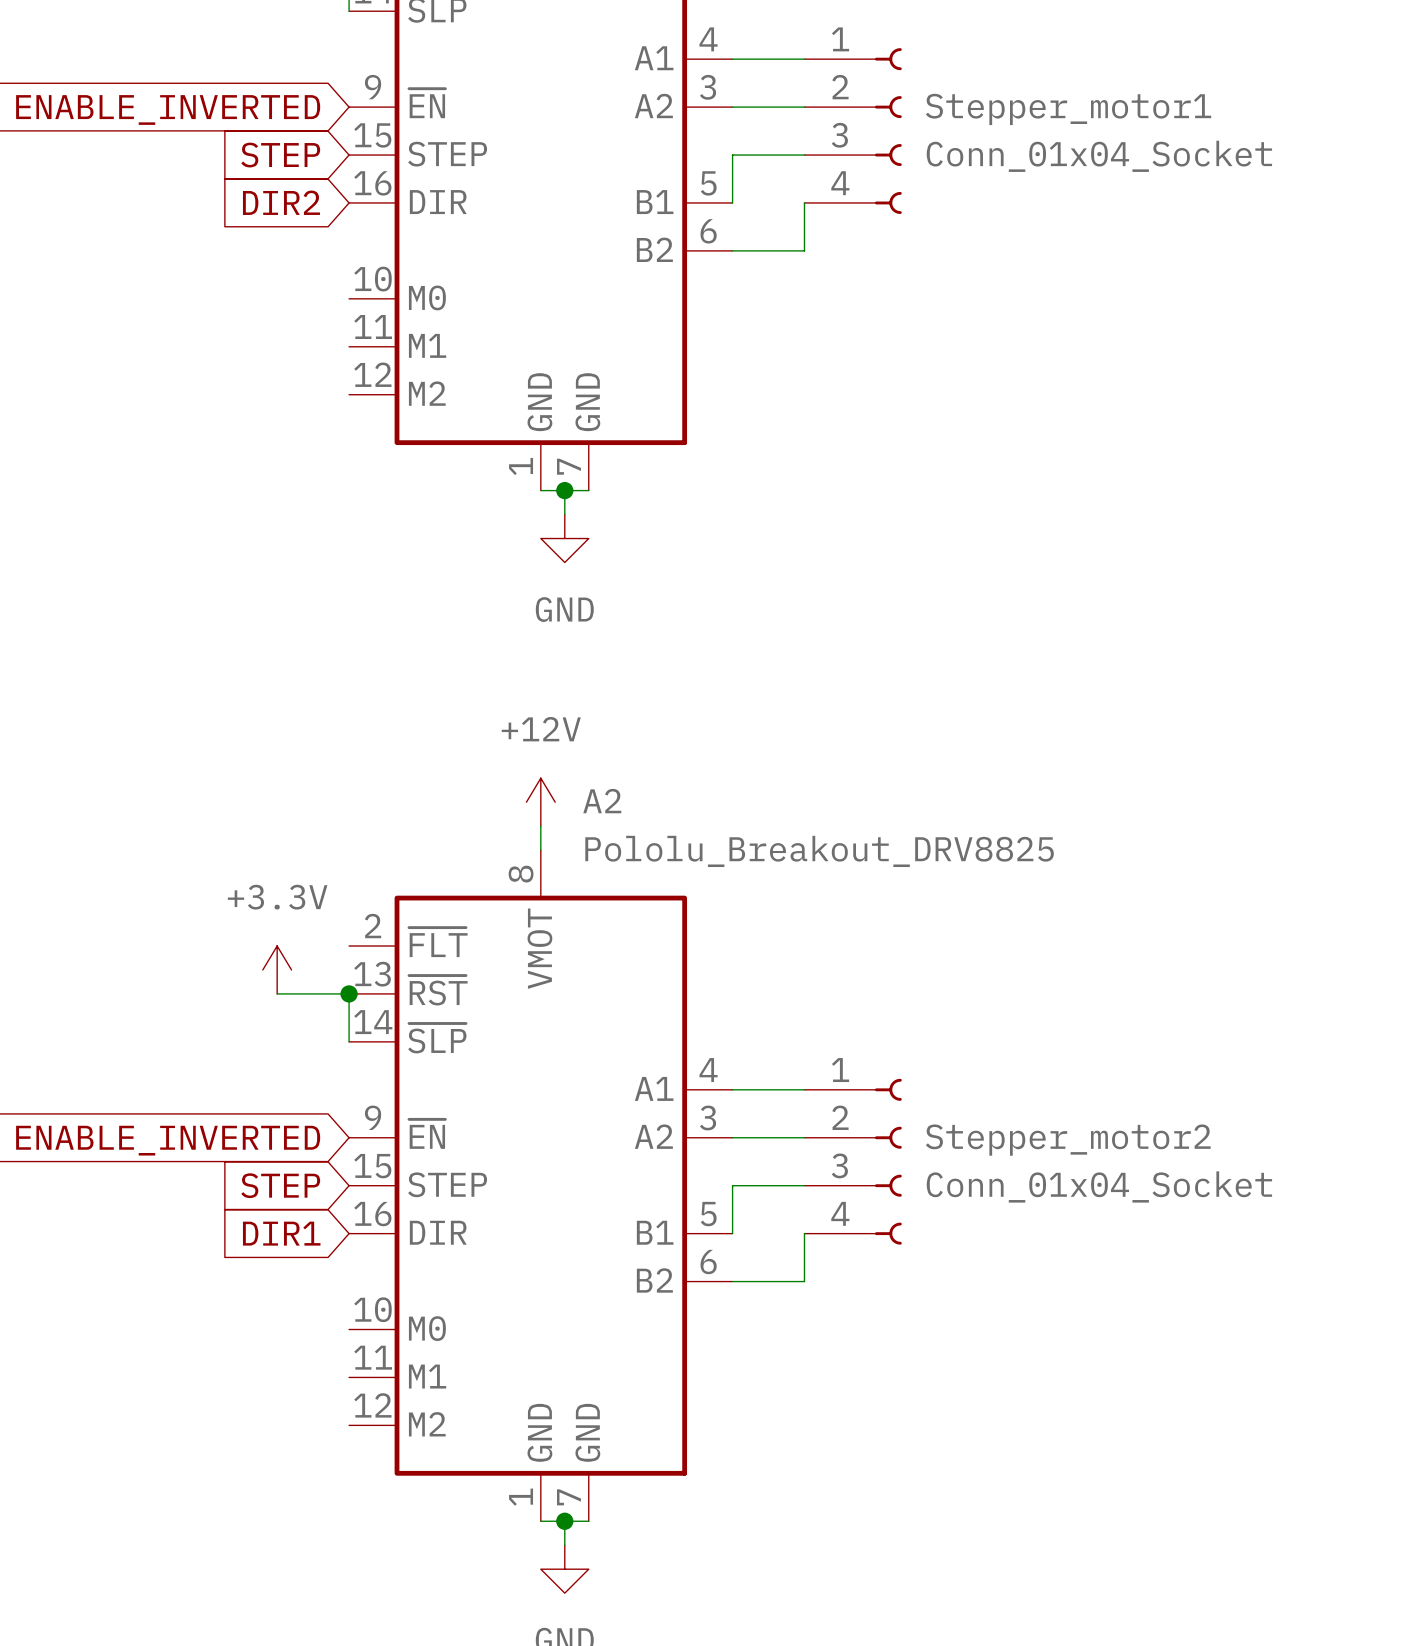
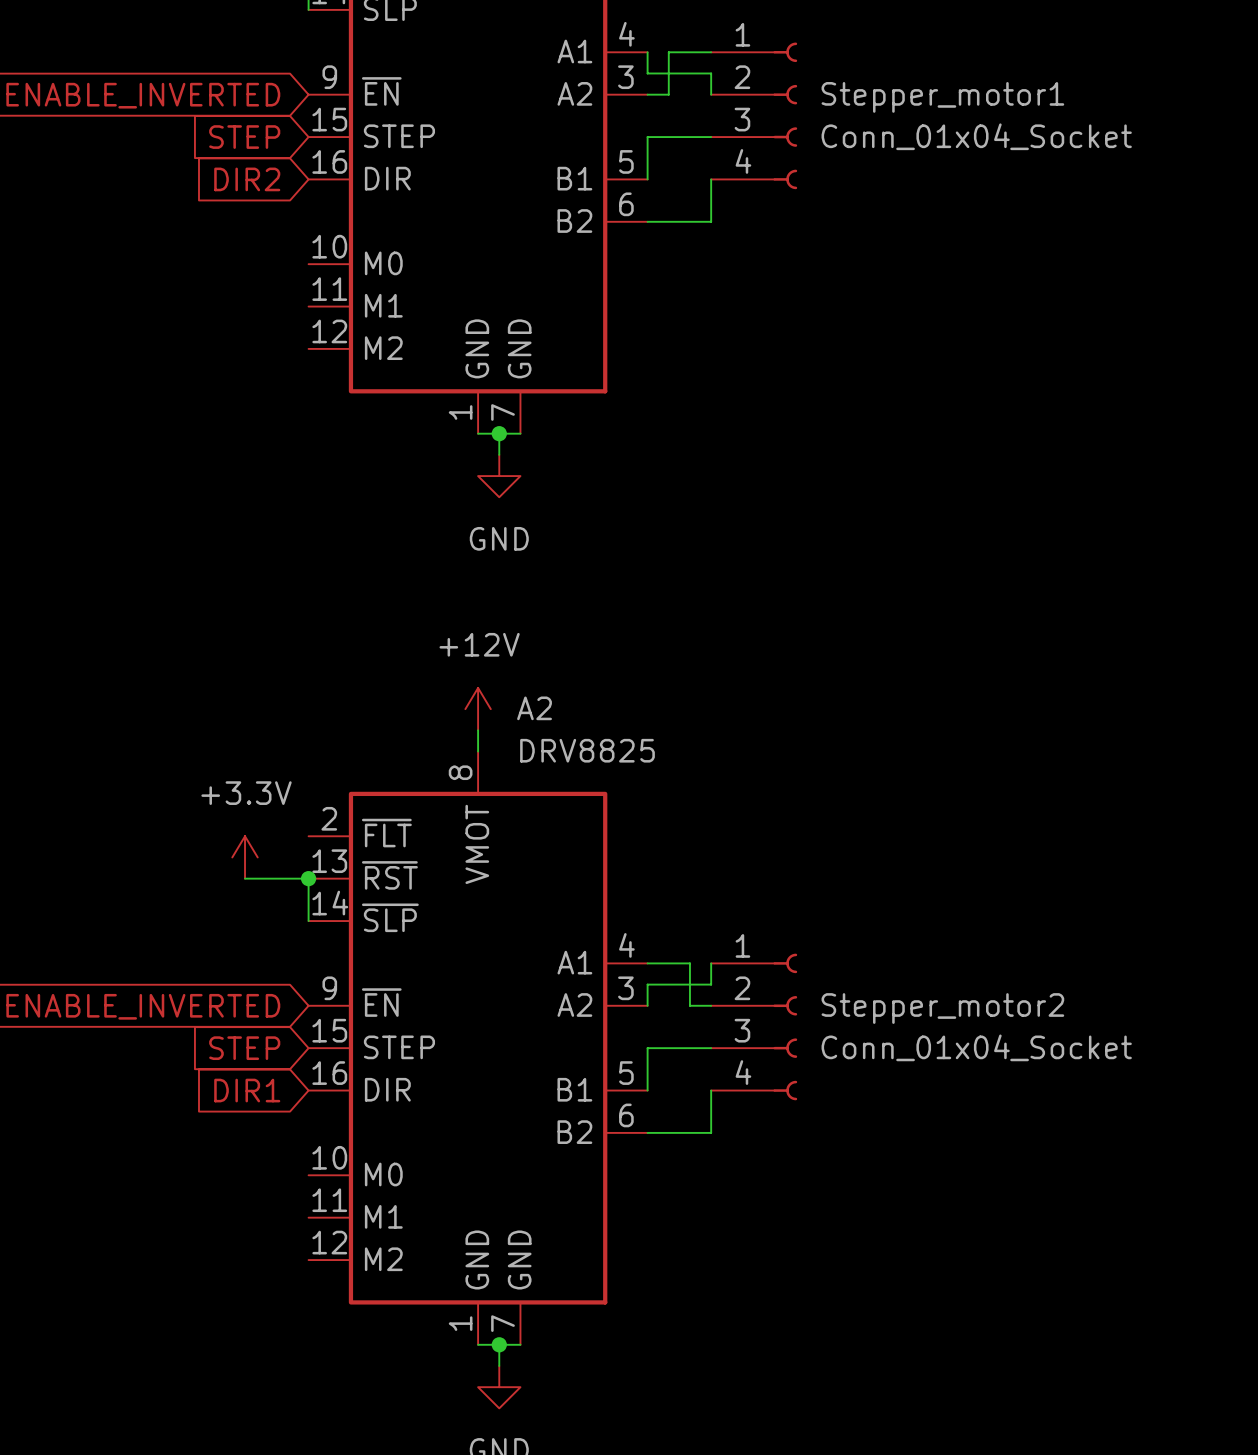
wire: (732, 59) (756, 59) -> (668, 94) (668, 52)
wire: (756, 107) (804, 107) -> (647, 52) (647, 73) (711, 73) (711, 94)
A2 value: Pololu_Breakout_DRV8825 (819, 851) -> DRV8825 (587, 750)
wire: (780, 1089) (804, 1089) -> (689, 963) (689, 1005)
wire: (732, 1137) (780, 1137) -> (647, 1005) (647, 984) (711, 984) (711, 963)

